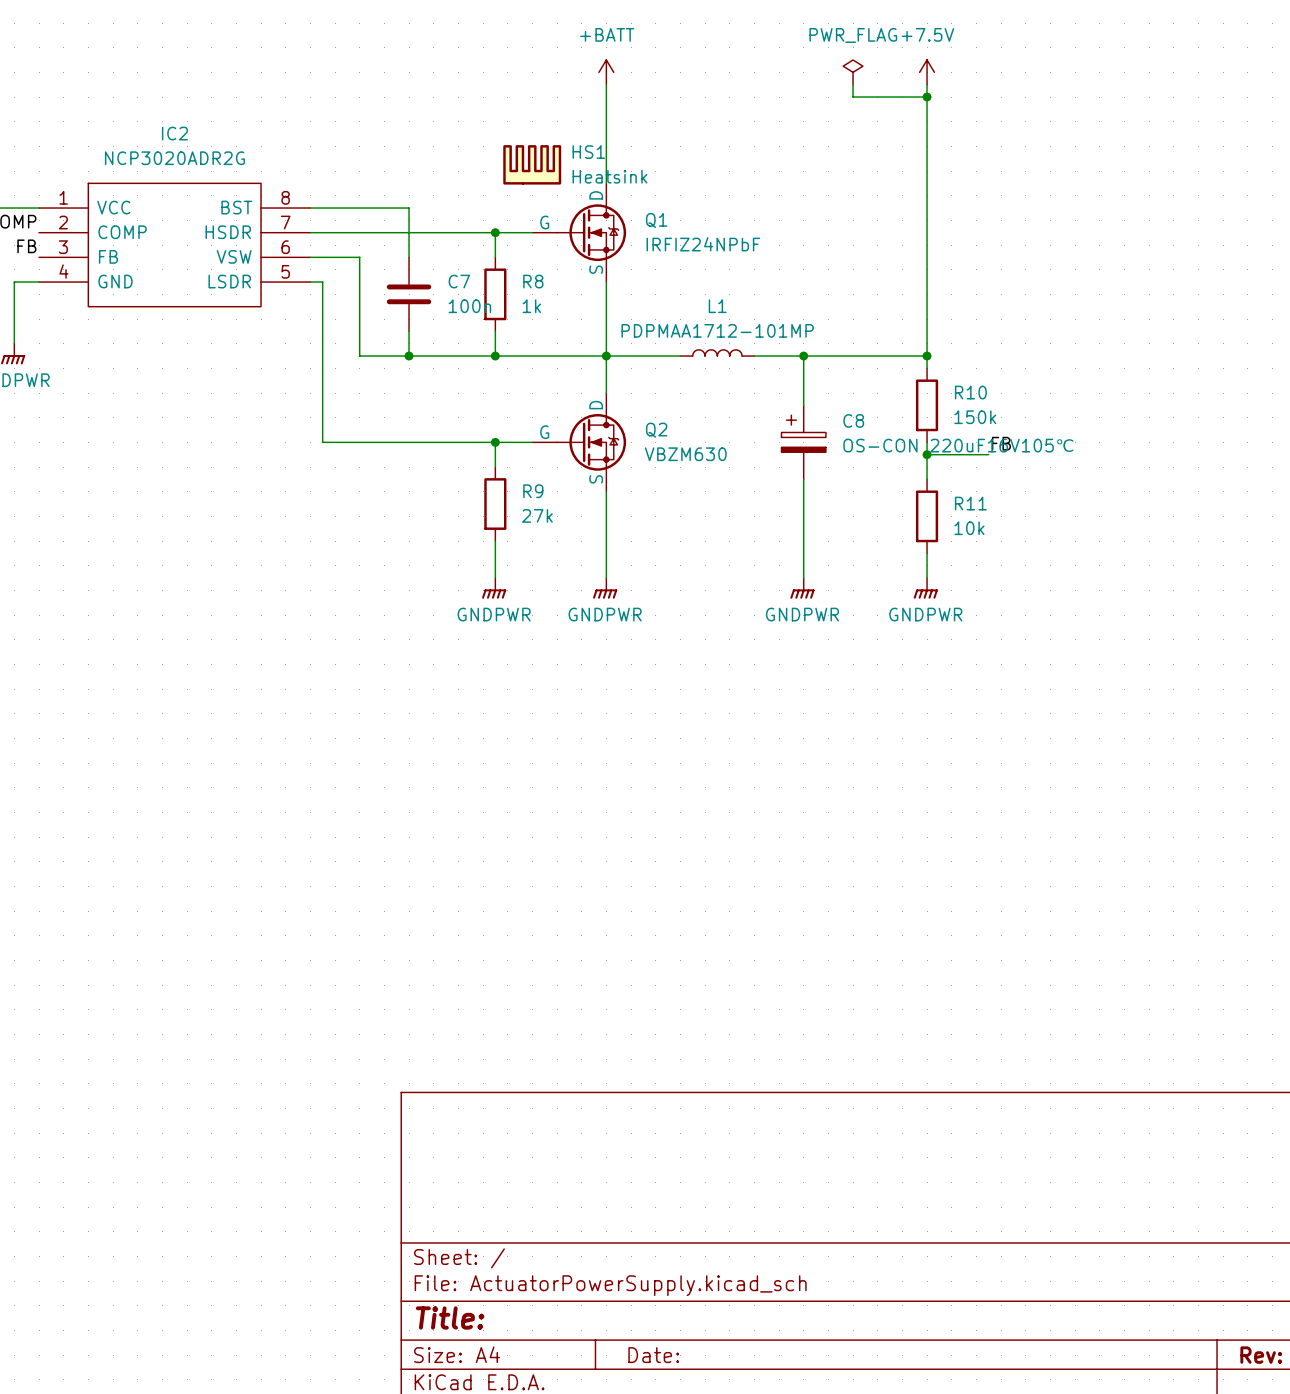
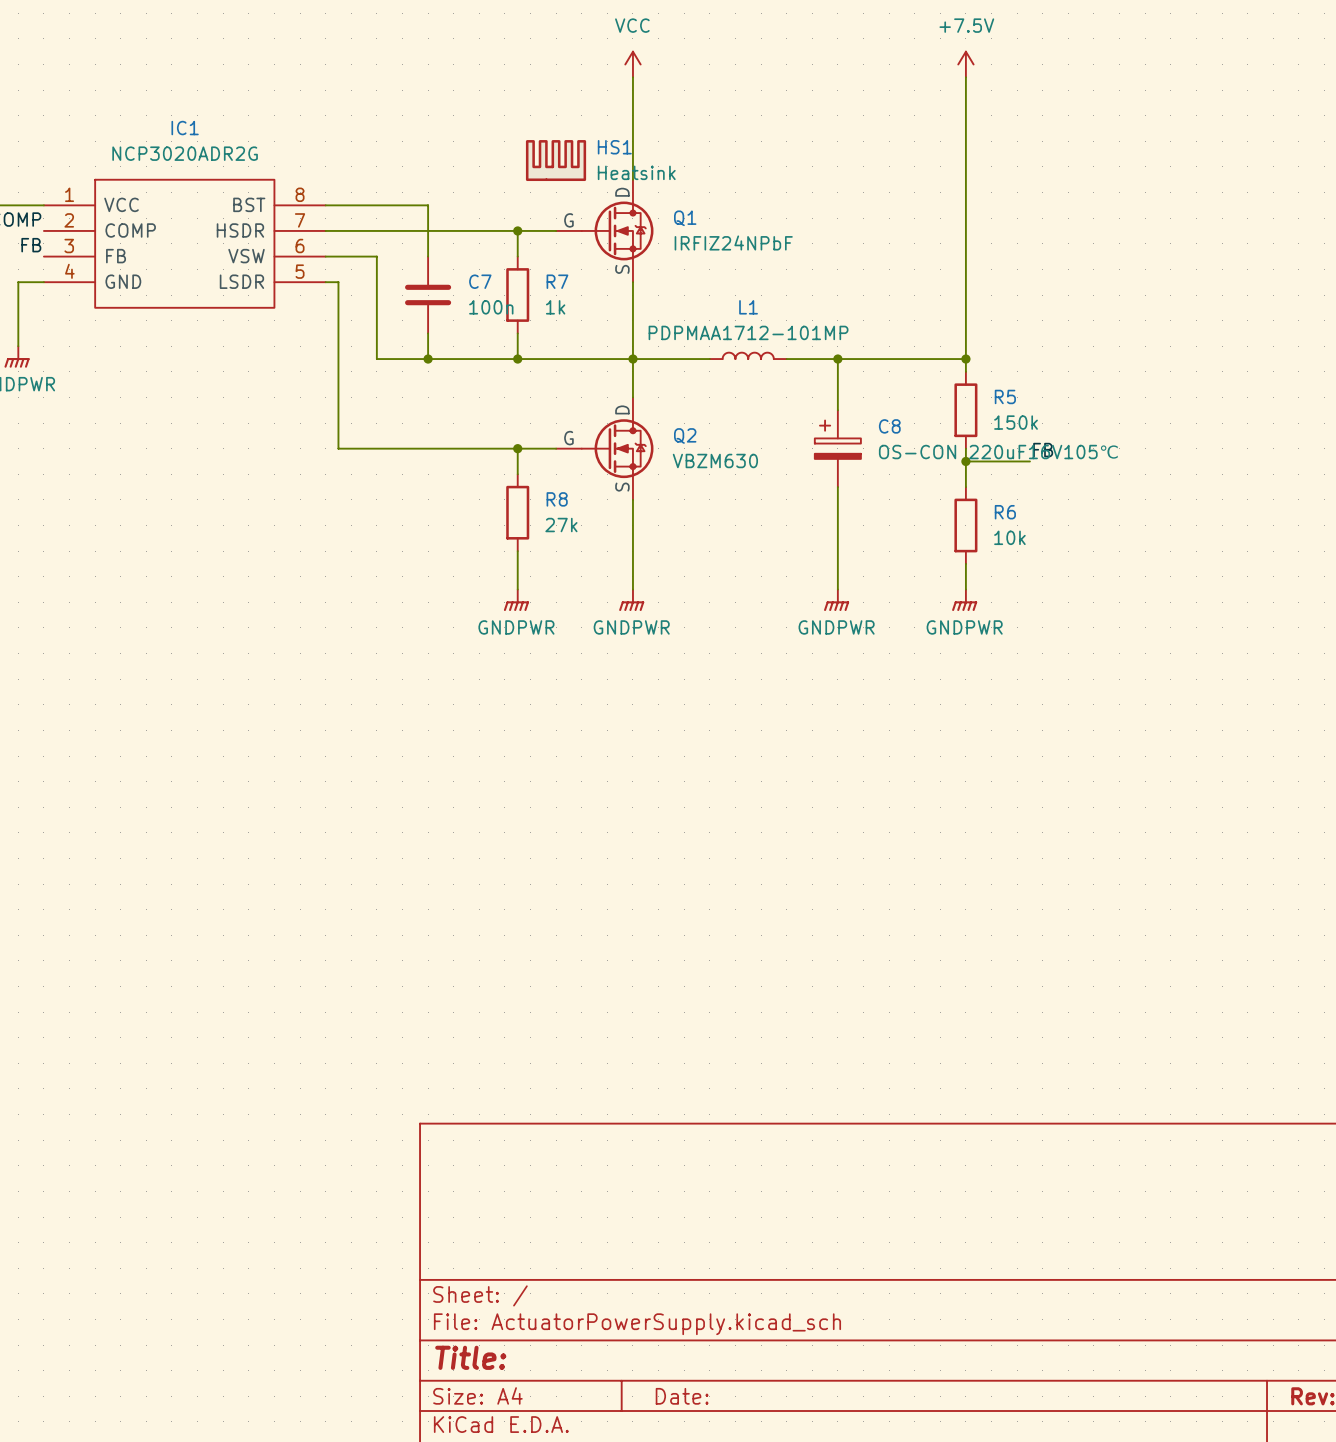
power symbol: +BATT (606, 72) -> VCC (632, 64)
power symbol: PWR_FLAG (853, 72) -> none
wire: (853, 84) (853, 97) (927, 97) -> none
junction: (927, 97) -> none
IC2 name: IC2 (174, 133) -> IC1 (185, 128)
R8 name: R8 (533, 281) -> R7 (557, 281)
R10 name: R10 (970, 392) -> R5 (1005, 396)
R9 name: R9 (533, 491) -> R8 (557, 499)
R11 name: R11 (970, 503) -> R6 (1005, 512)

